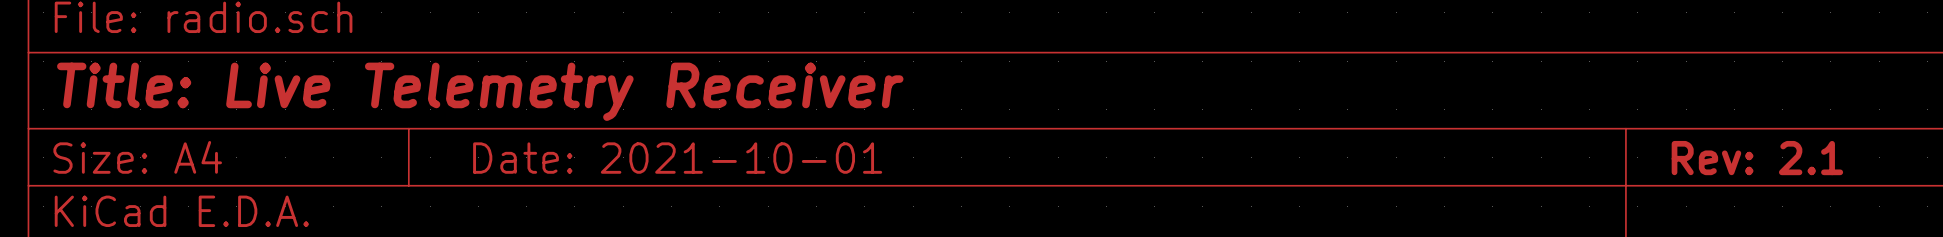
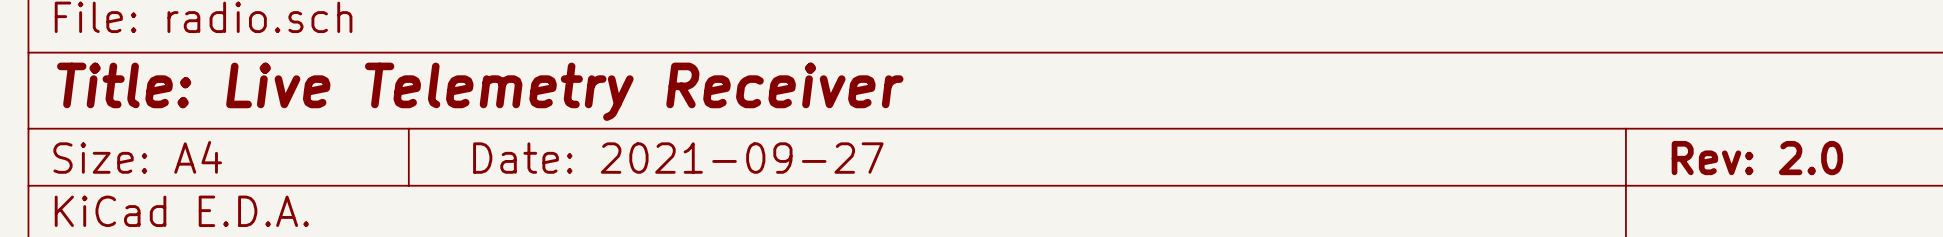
title block: Date: 2021-10-01 (677, 158) -> Date: 2021-09-27 (678, 158)
title block: Rev: 2.1 (1757, 158) -> Rev: 2.0 (1757, 158)

